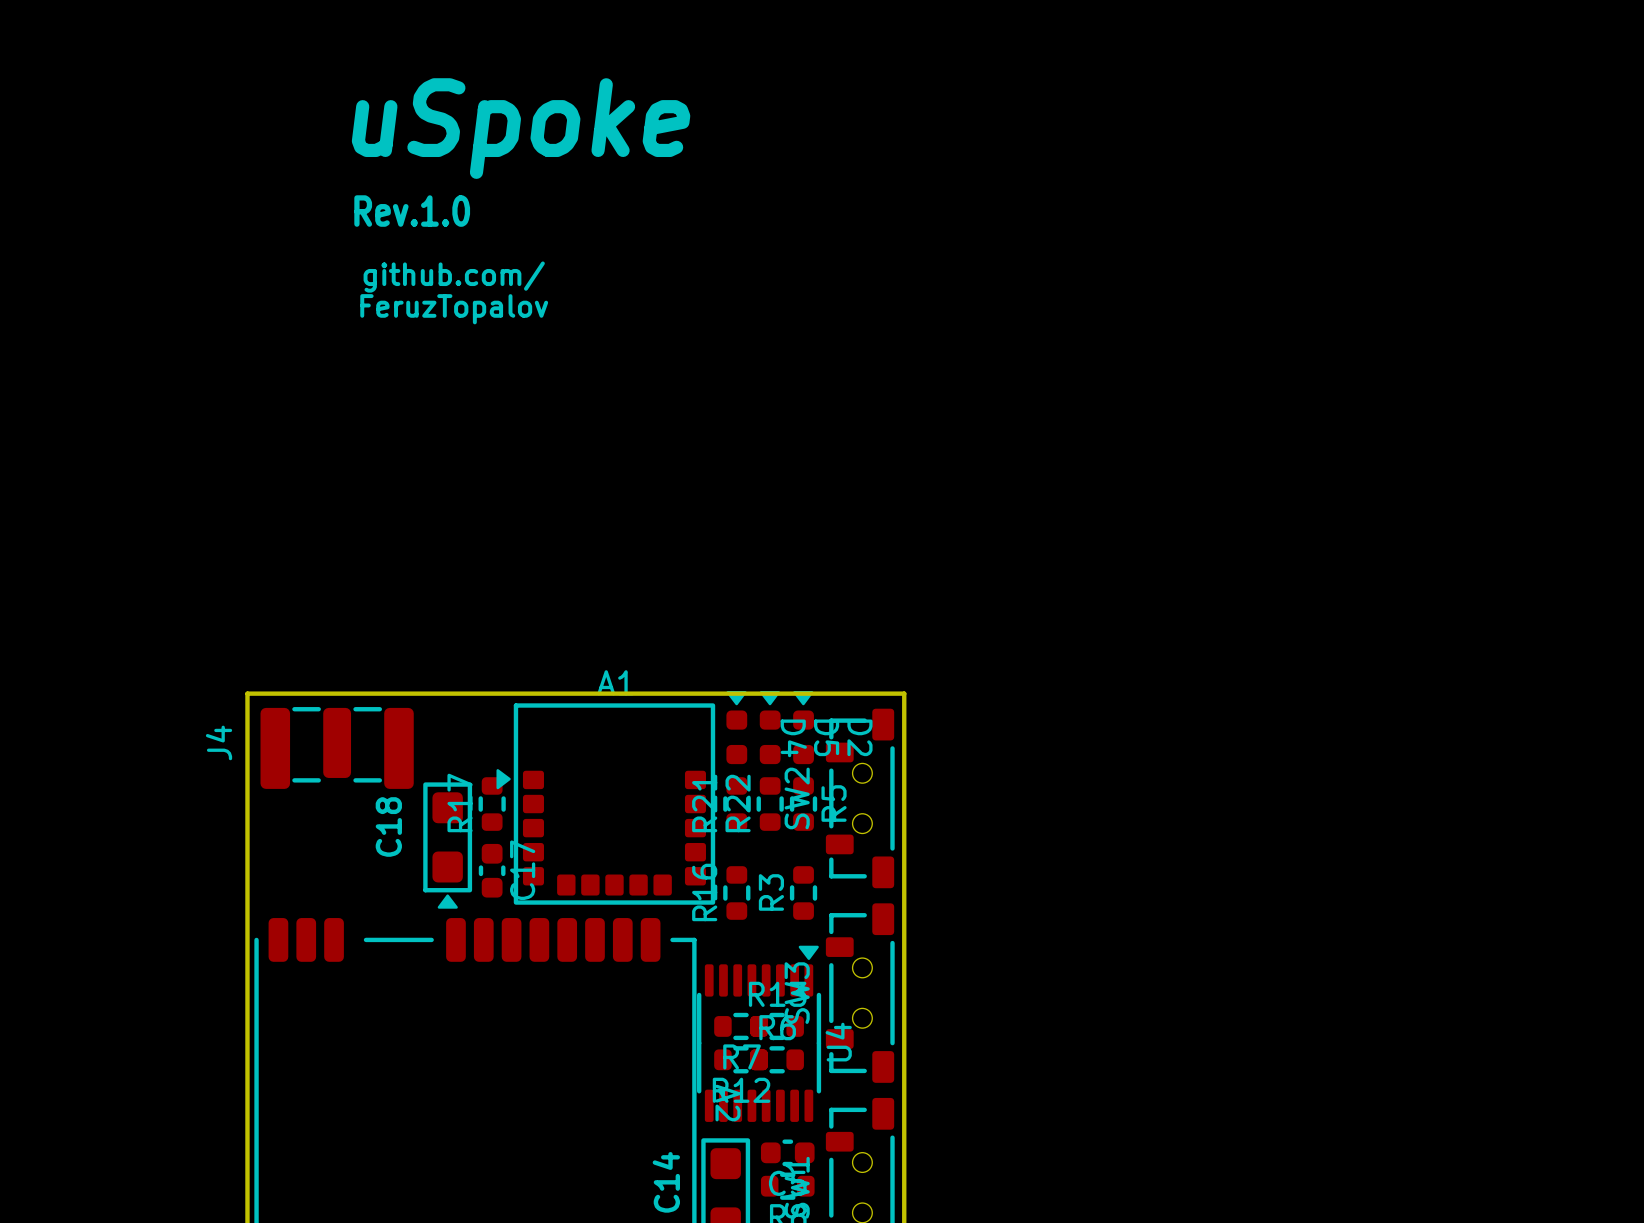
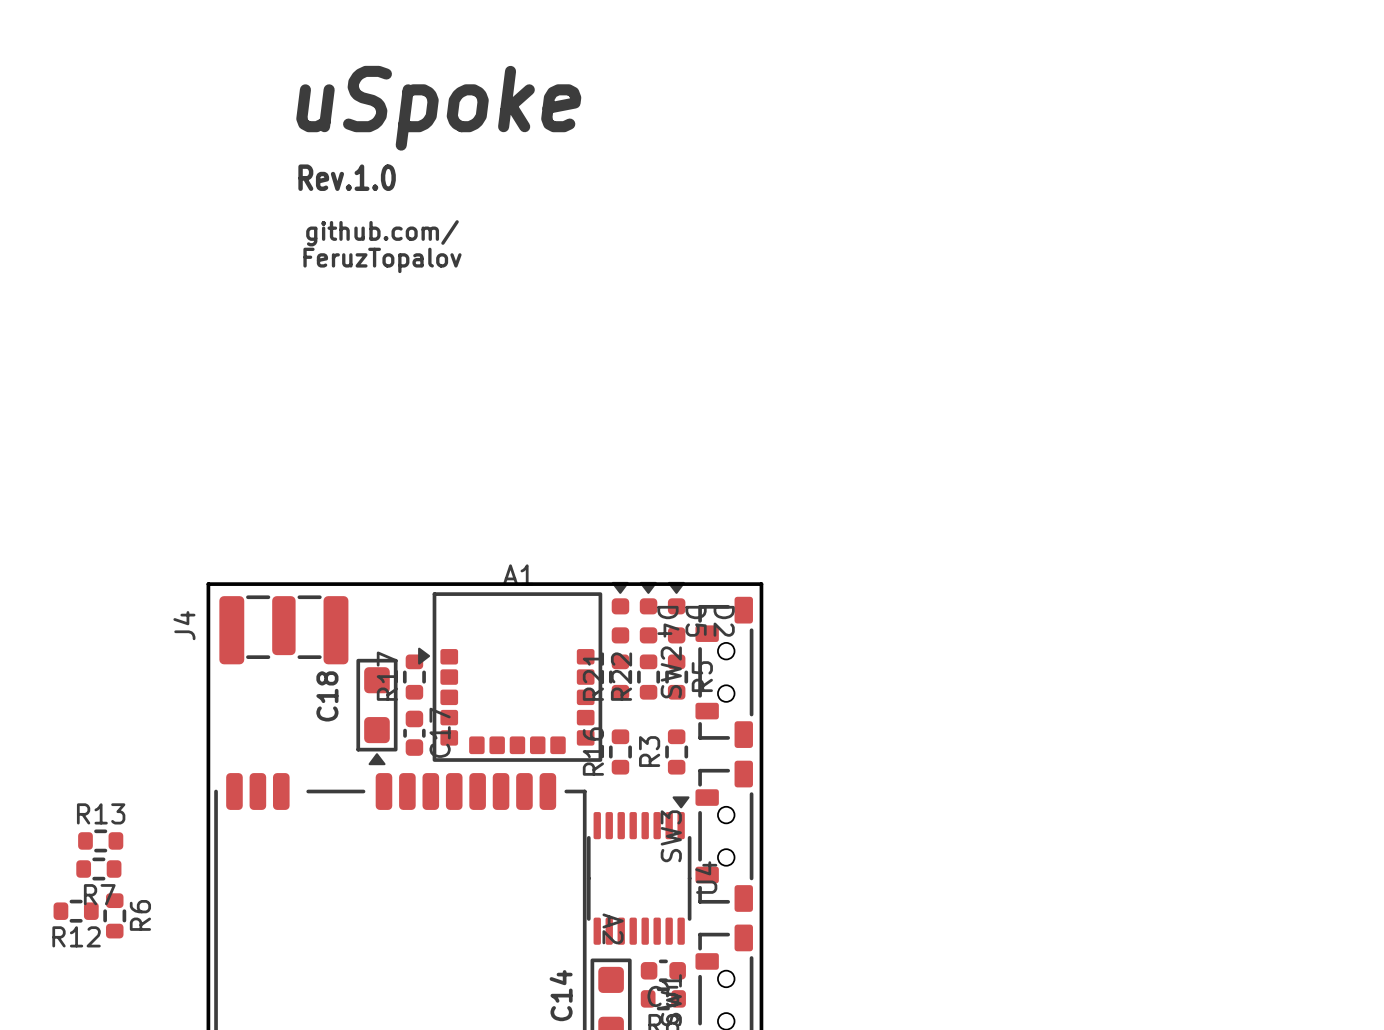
R7 position: (740, 1026) -> (98, 869)
R13 position: (777, 1026) -> (100, 840)
R12 position: (740, 1059) -> (76, 911)
R6 rotation: 0° (777, 1059) -> 90° clockwise (114, 915)
R6 position: (777, 1059) -> (114, 915)

